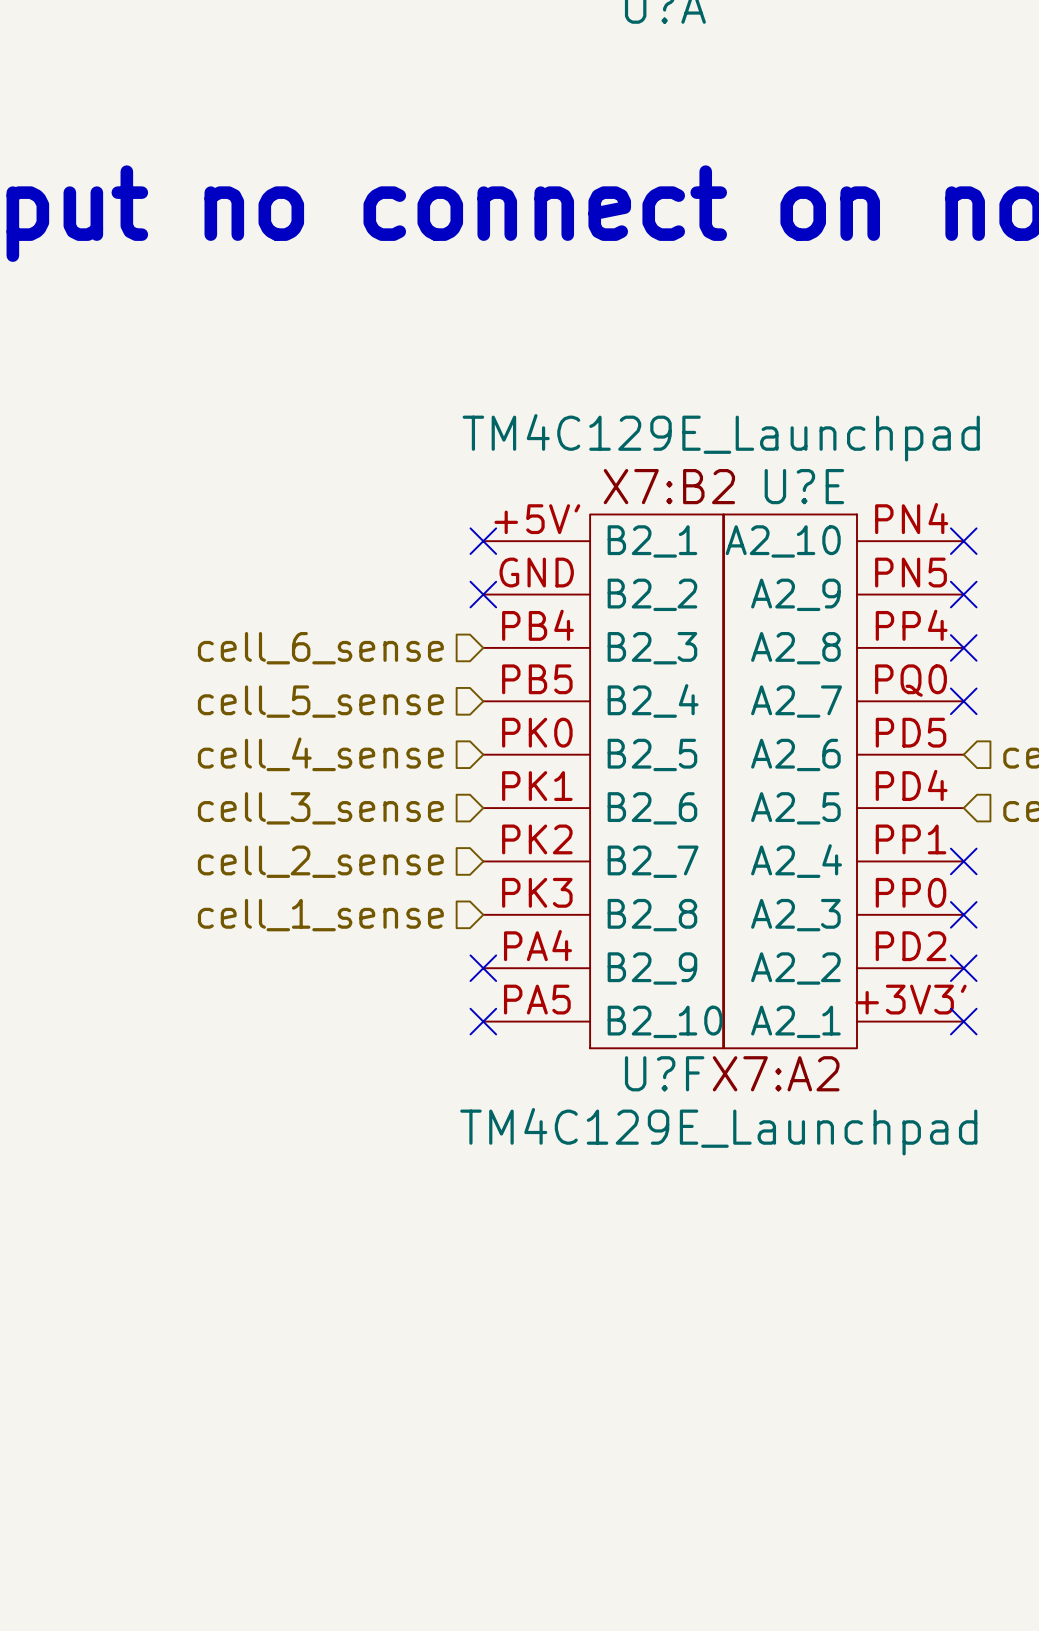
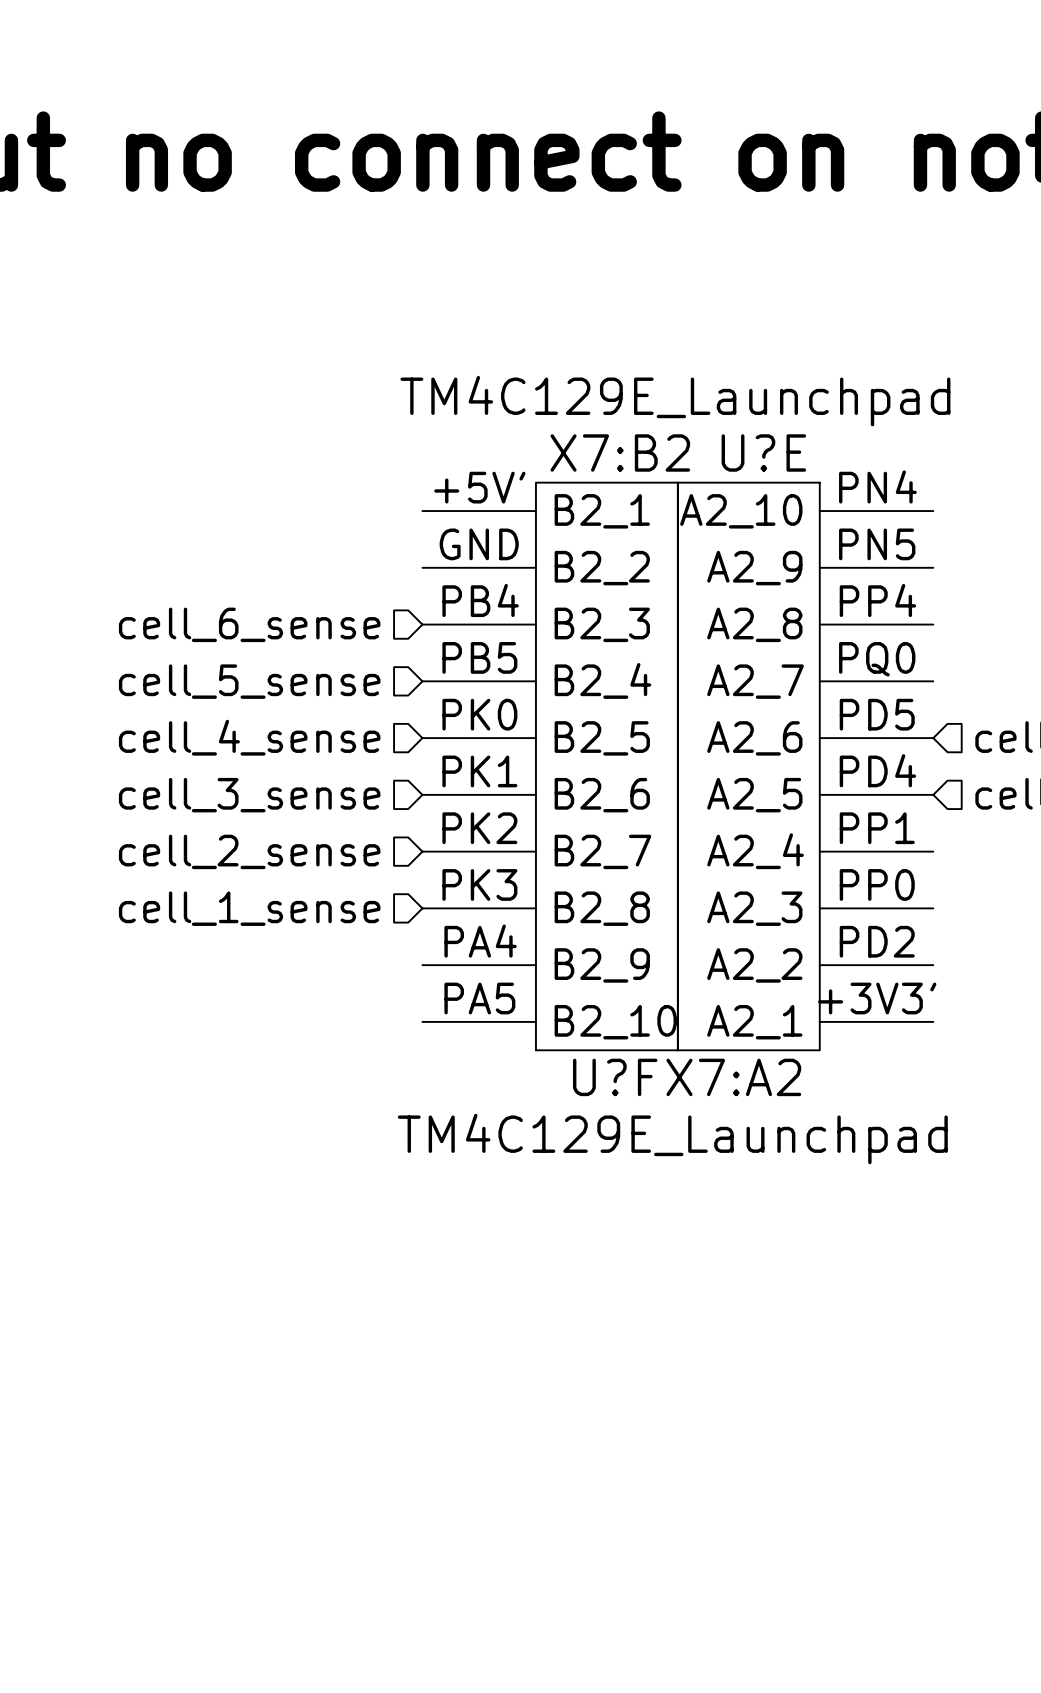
no-connect mark: (483, 541) -> none
no-connect mark: (963, 541) -> none
no-connect mark: (483, 594) -> none
no-connect mark: (963, 594) -> none
no-connect mark: (963, 647) -> none
no-connect mark: (963, 701) -> none
no-connect mark: (963, 861) -> none
no-connect mark: (963, 914) -> none
no-connect mark: (483, 968) -> none
no-connect mark: (963, 968) -> none
no-connect mark: (483, 1021) -> none
no-connect mark: (963, 1021) -> none

